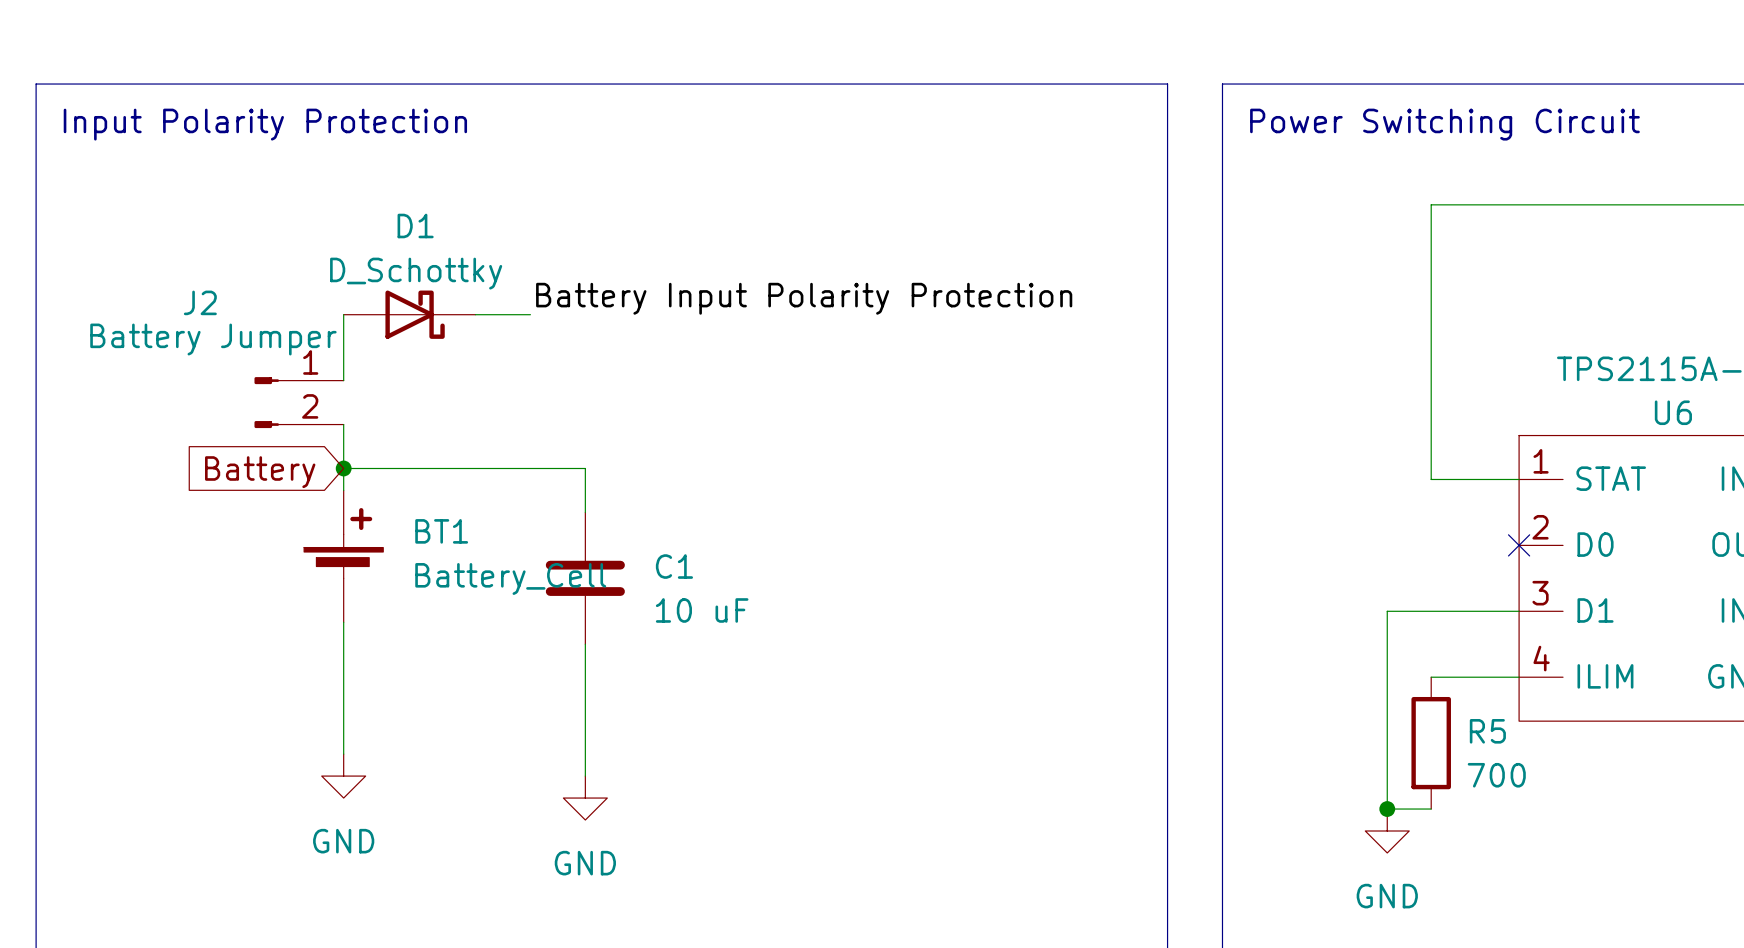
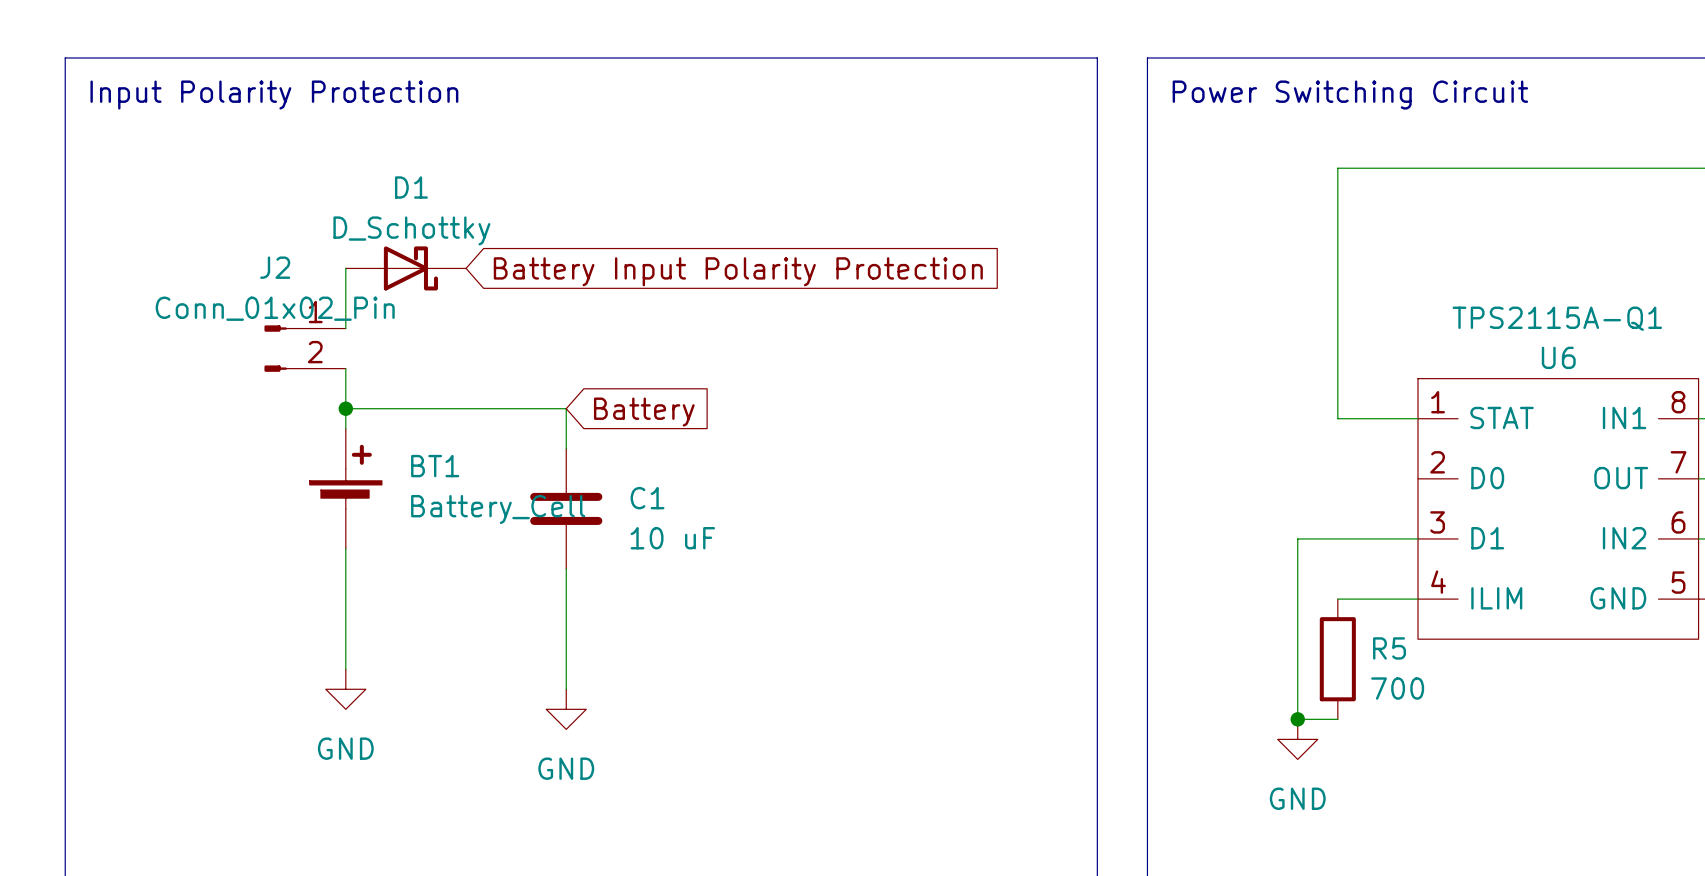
label: Battery Input Polarity Protection (804, 298) -> none
J2 name position: J2 (200, 302) -> J2 (275, 267)
wire: (475, 314) (530, 314) -> none
global label: none -> Battery Input Polarity Protection (738, 271)
J2 value: Battery Jumper (213, 339) -> Conn_01x02_Pin (275, 308)
global label rotation: 0° (260, 472) -> 180° (644, 412)
global label position: Battery (260, 472) -> Battery (644, 412)
no-connect mark: (1519, 545) -> none

